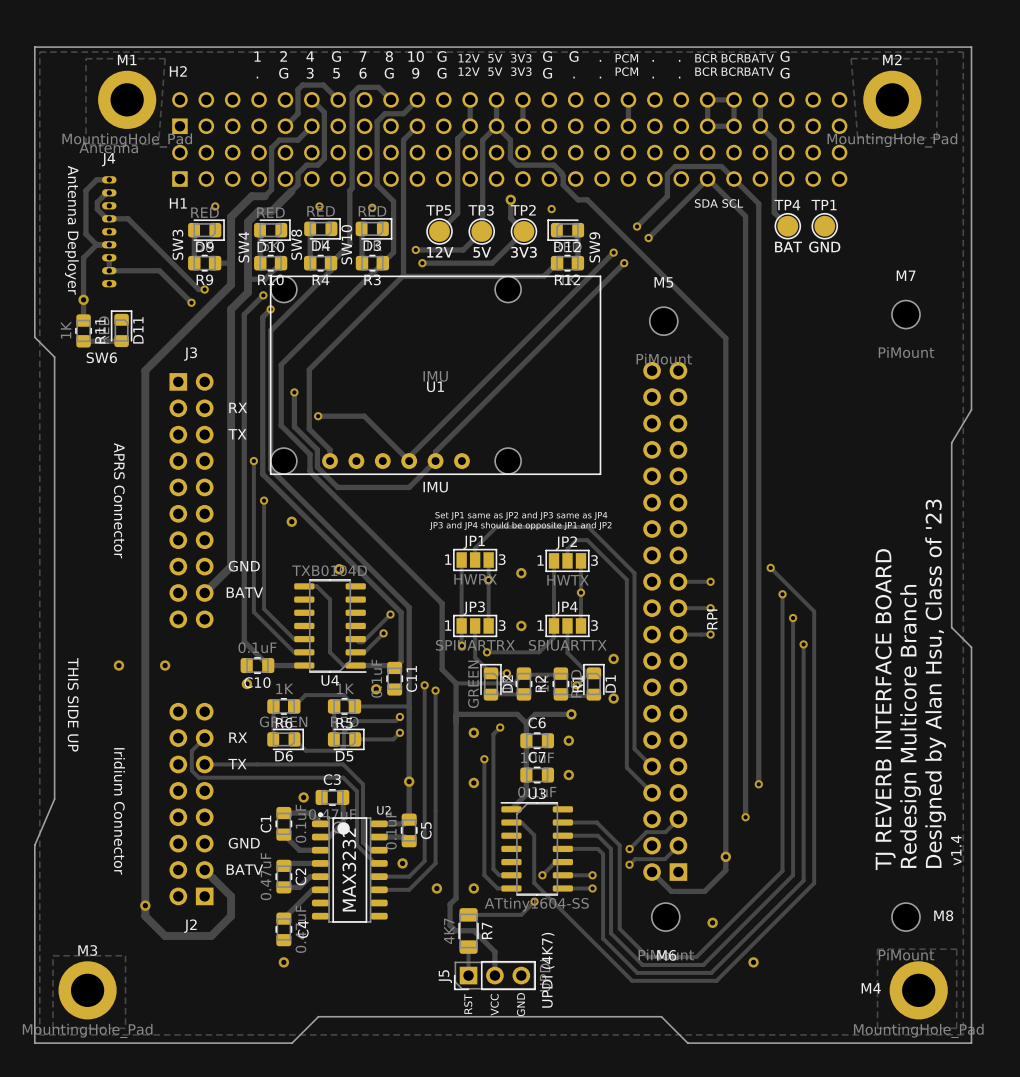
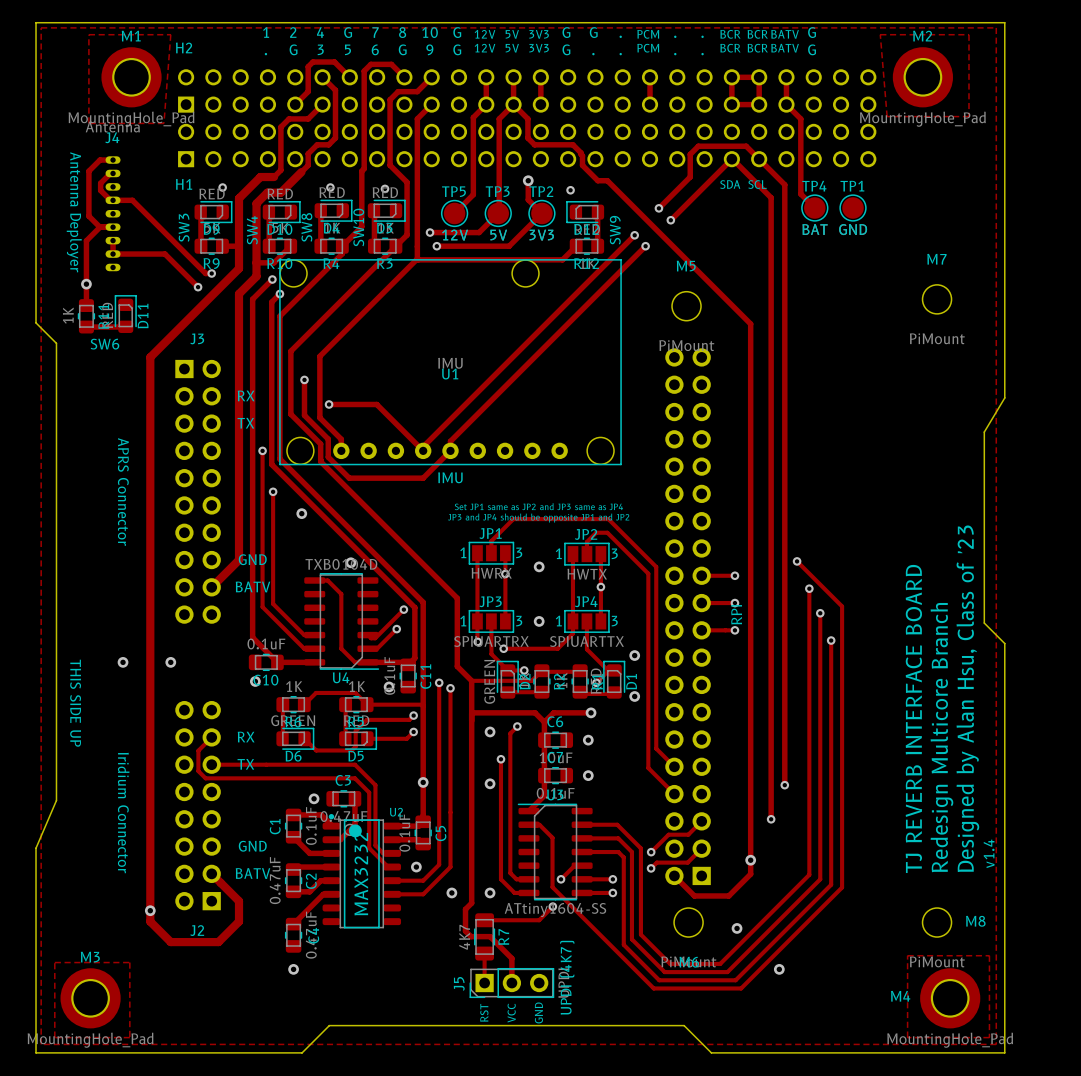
U1 footprint: [270, 275, 602, 475] -> [279, 259, 622, 466]

